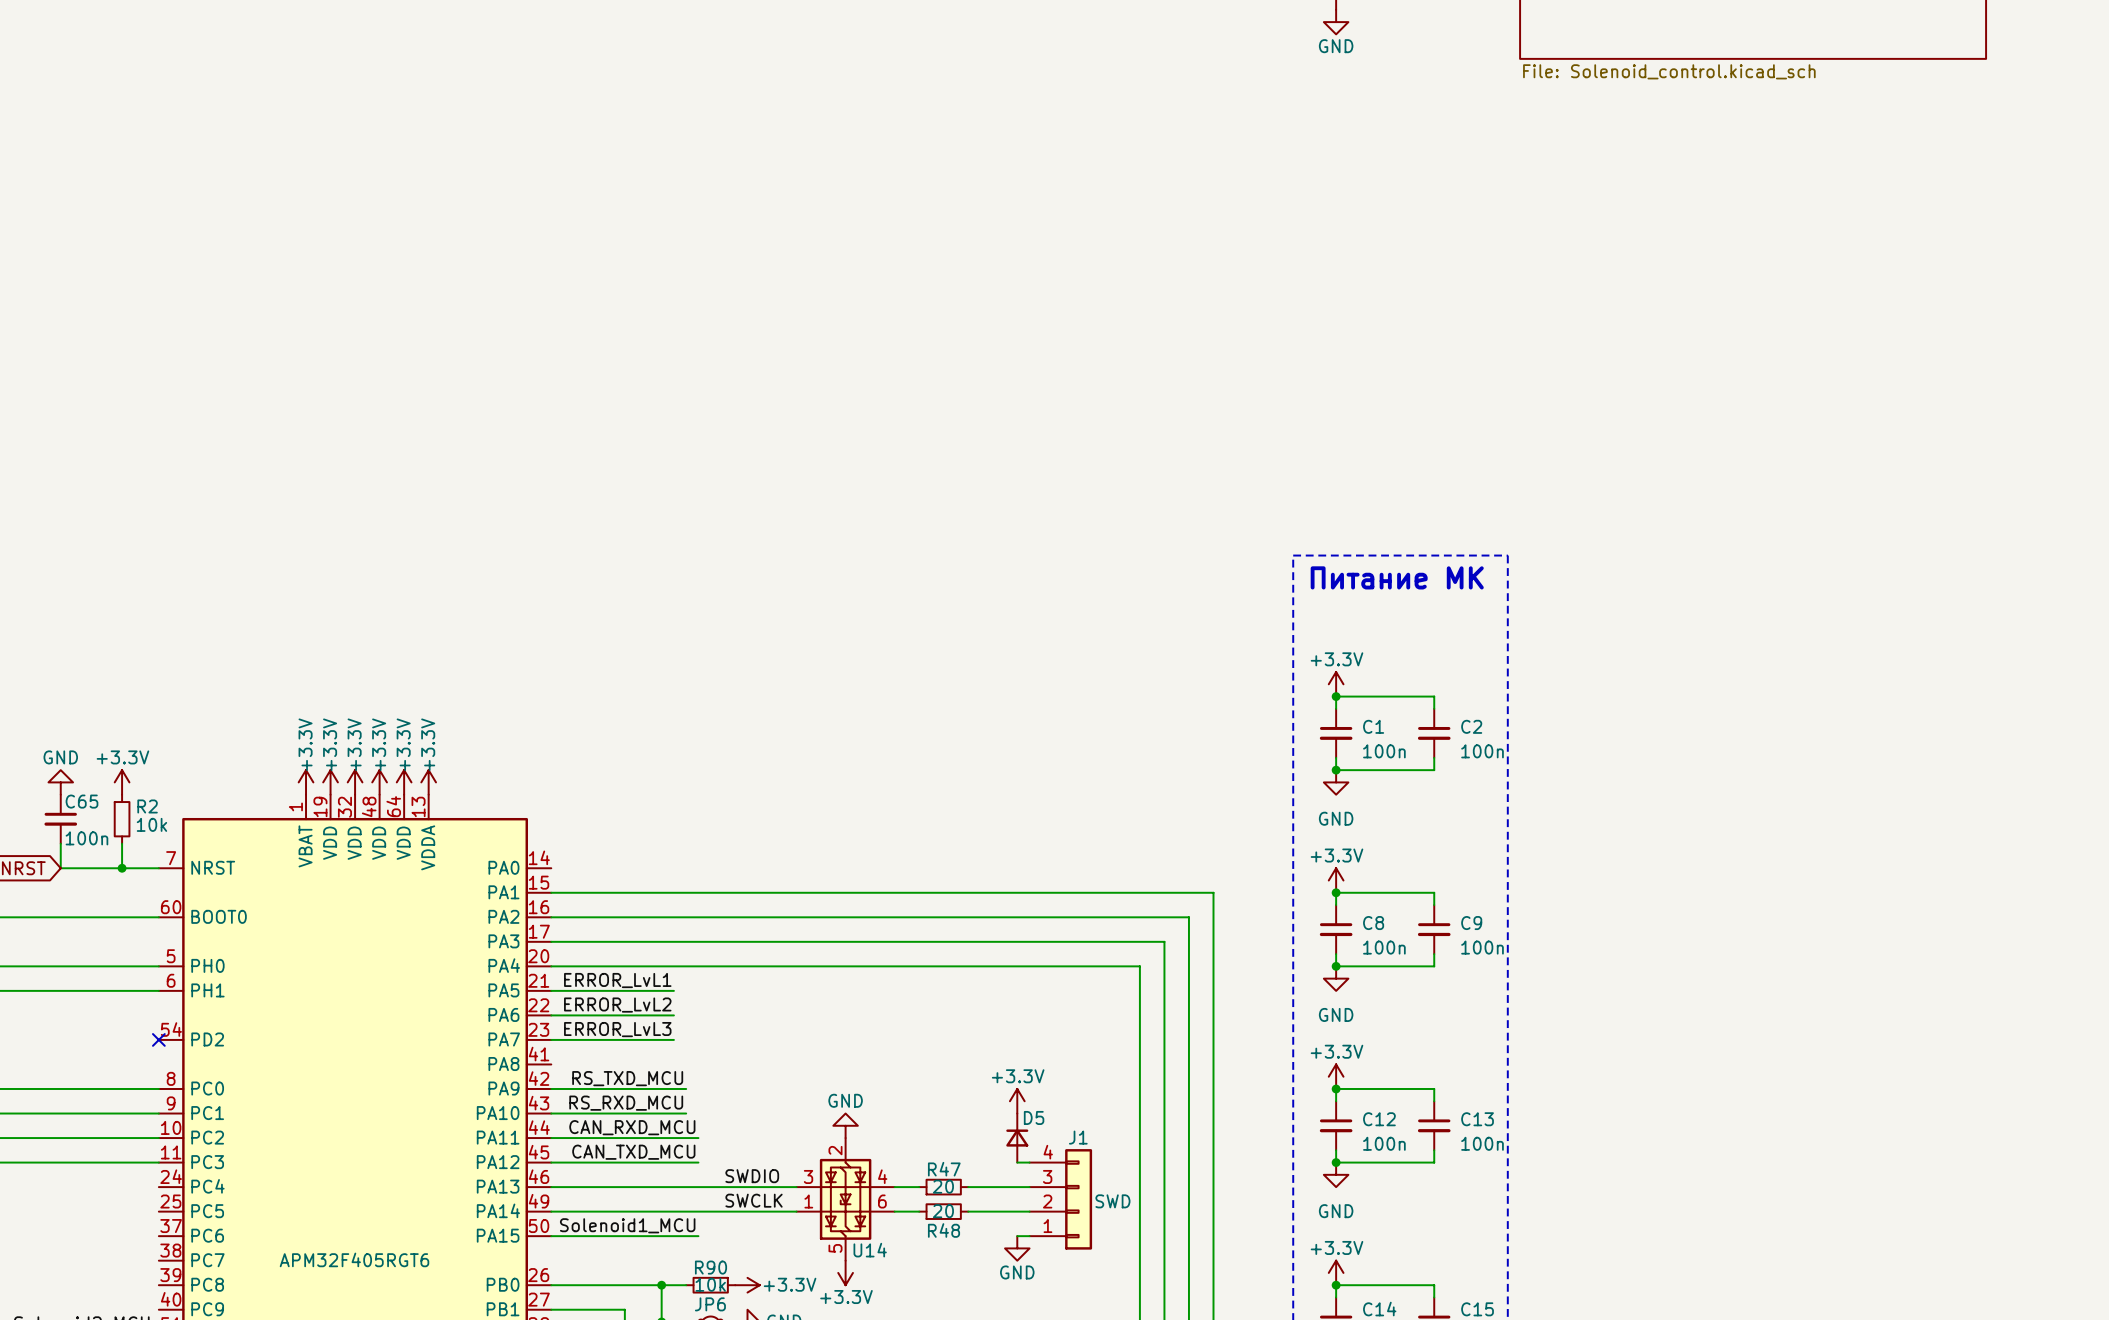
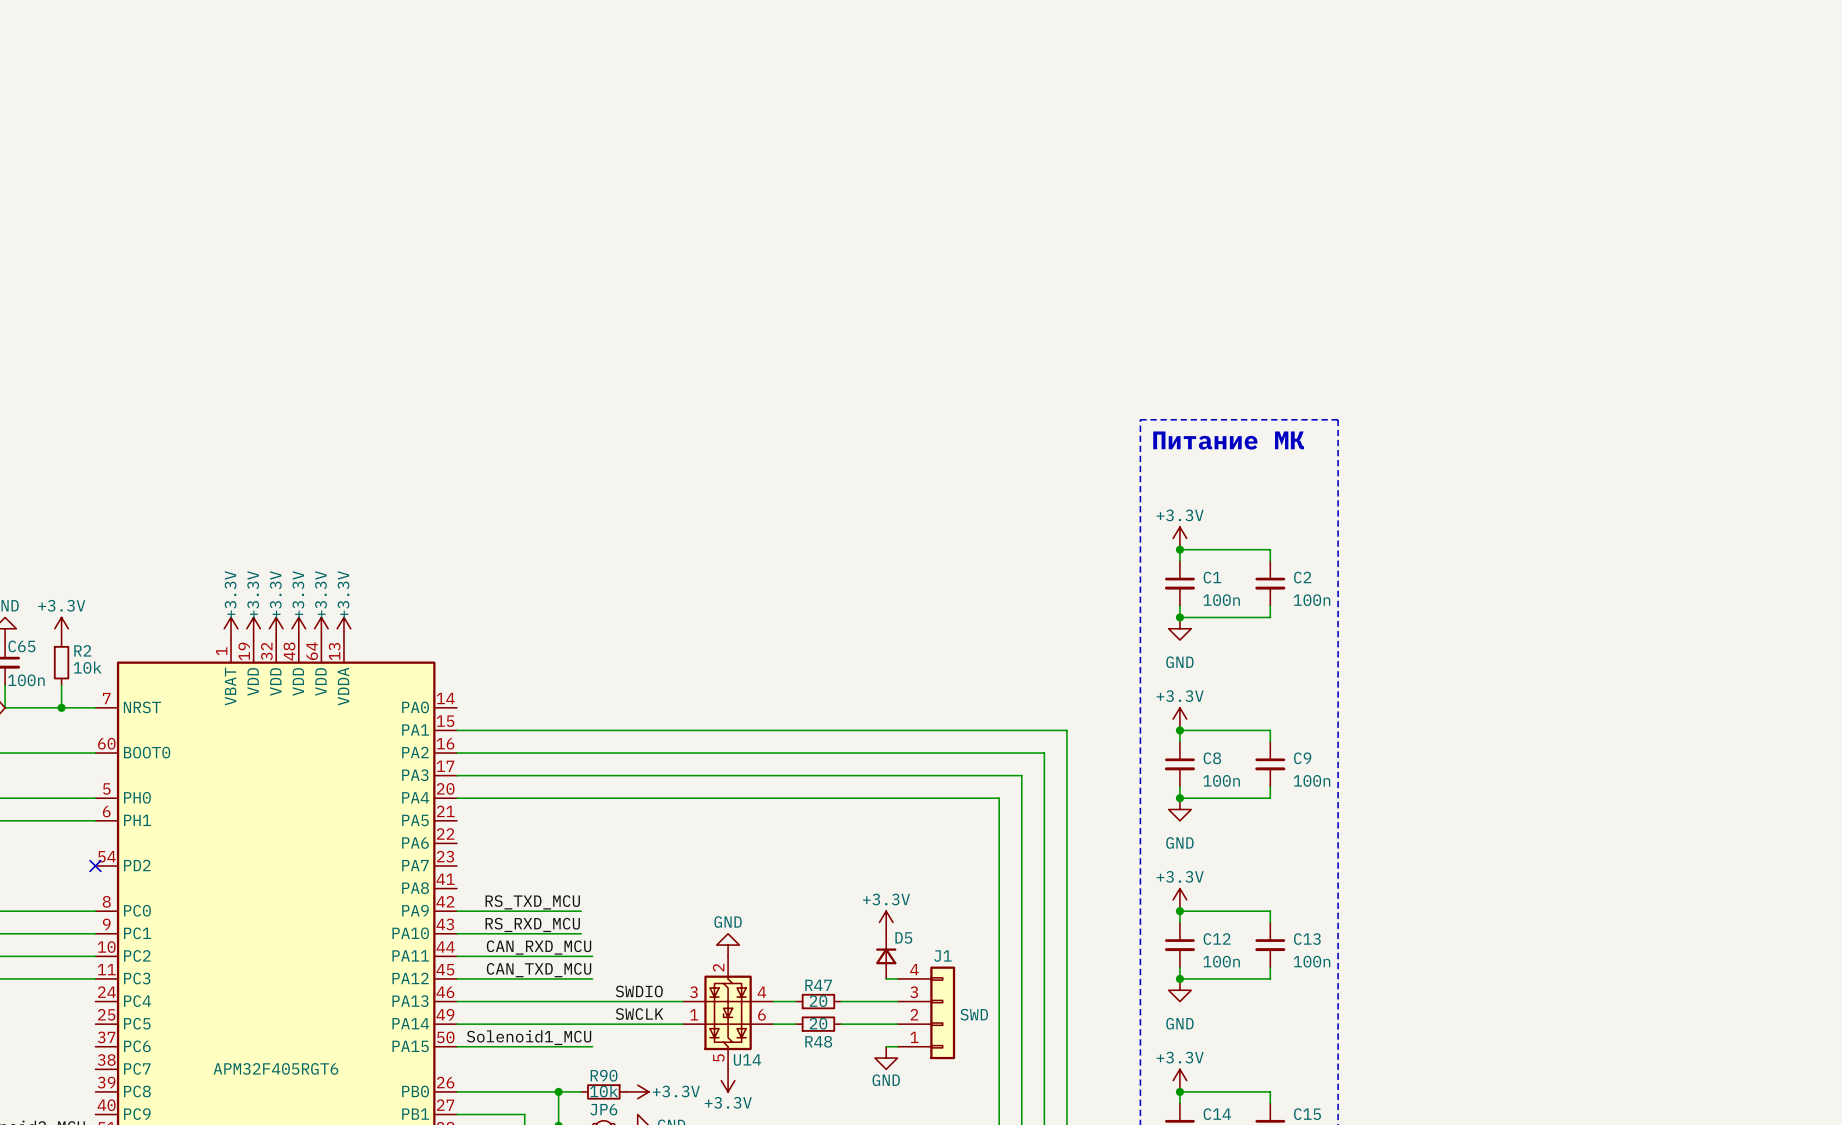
label: ERROR_LvL1 (617, 980) -> none
wire: (551, 990) (673, 990) -> none
label: ERROR_LvL2 (617, 1005) -> none
wire: (551, 1015) (673, 1015) -> none
label: ERROR_LvL3 (617, 1029) -> none
wire: (551, 1039) (673, 1039) -> none

